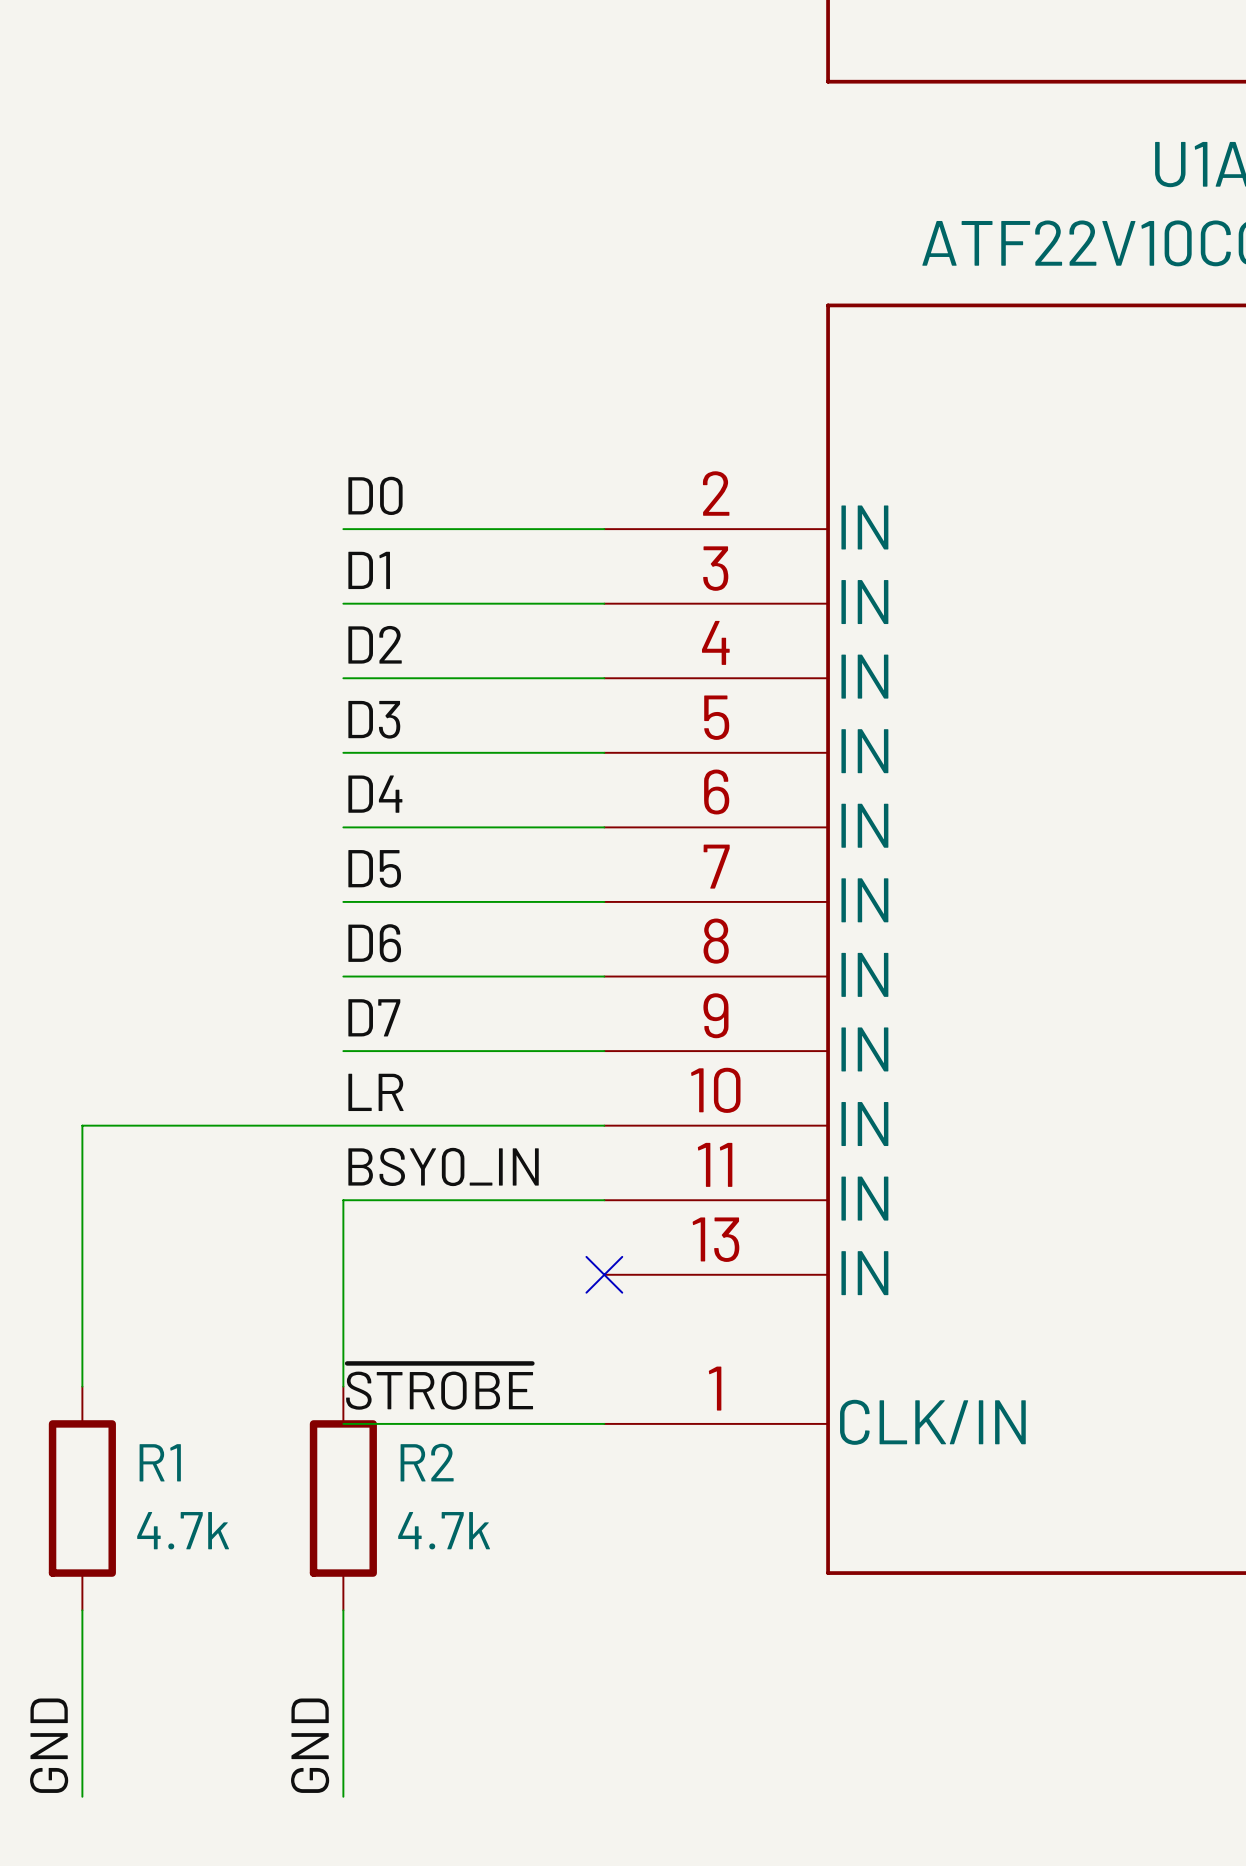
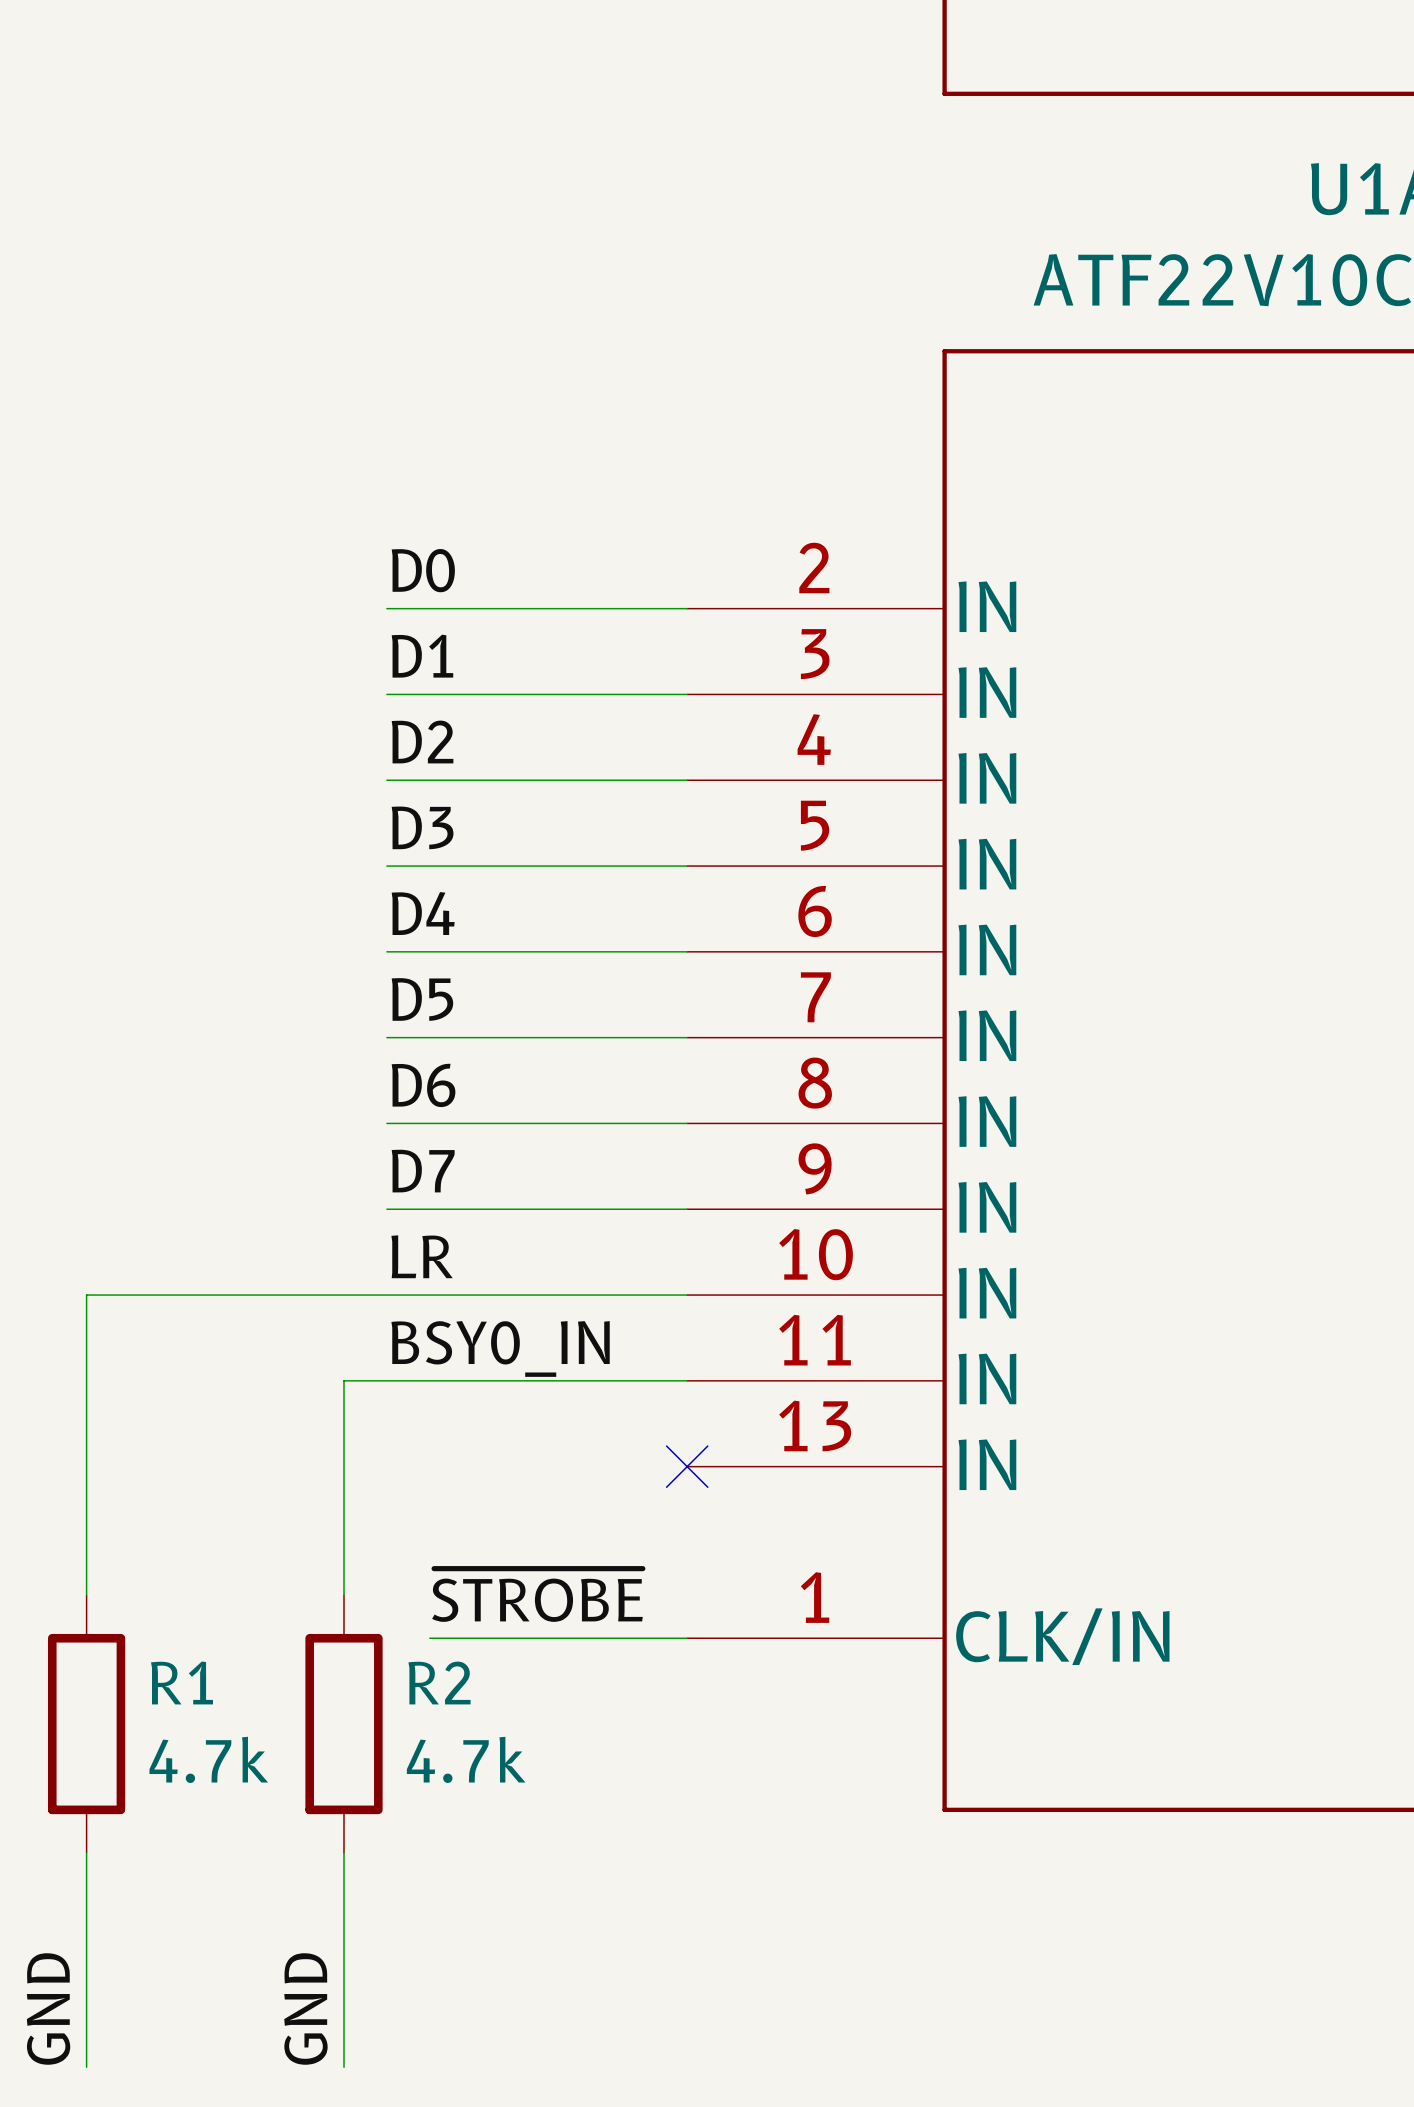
wire: (343, 1200) (343, 1386) -> (386, 1380) (343, 1380) (343, 1595)
label position: ~{STROBE} (439, 1386) -> ~{STROBE} (537, 1595)
wire: (343, 1423) (380, 1423) -> none
R2 position: (343, 1498) -> (343, 1724)
wire: (343, 1610) (343, 1796) -> (343, 1852) (343, 2067)
label position: GND (310, 1745) -> GND (305, 2008)

